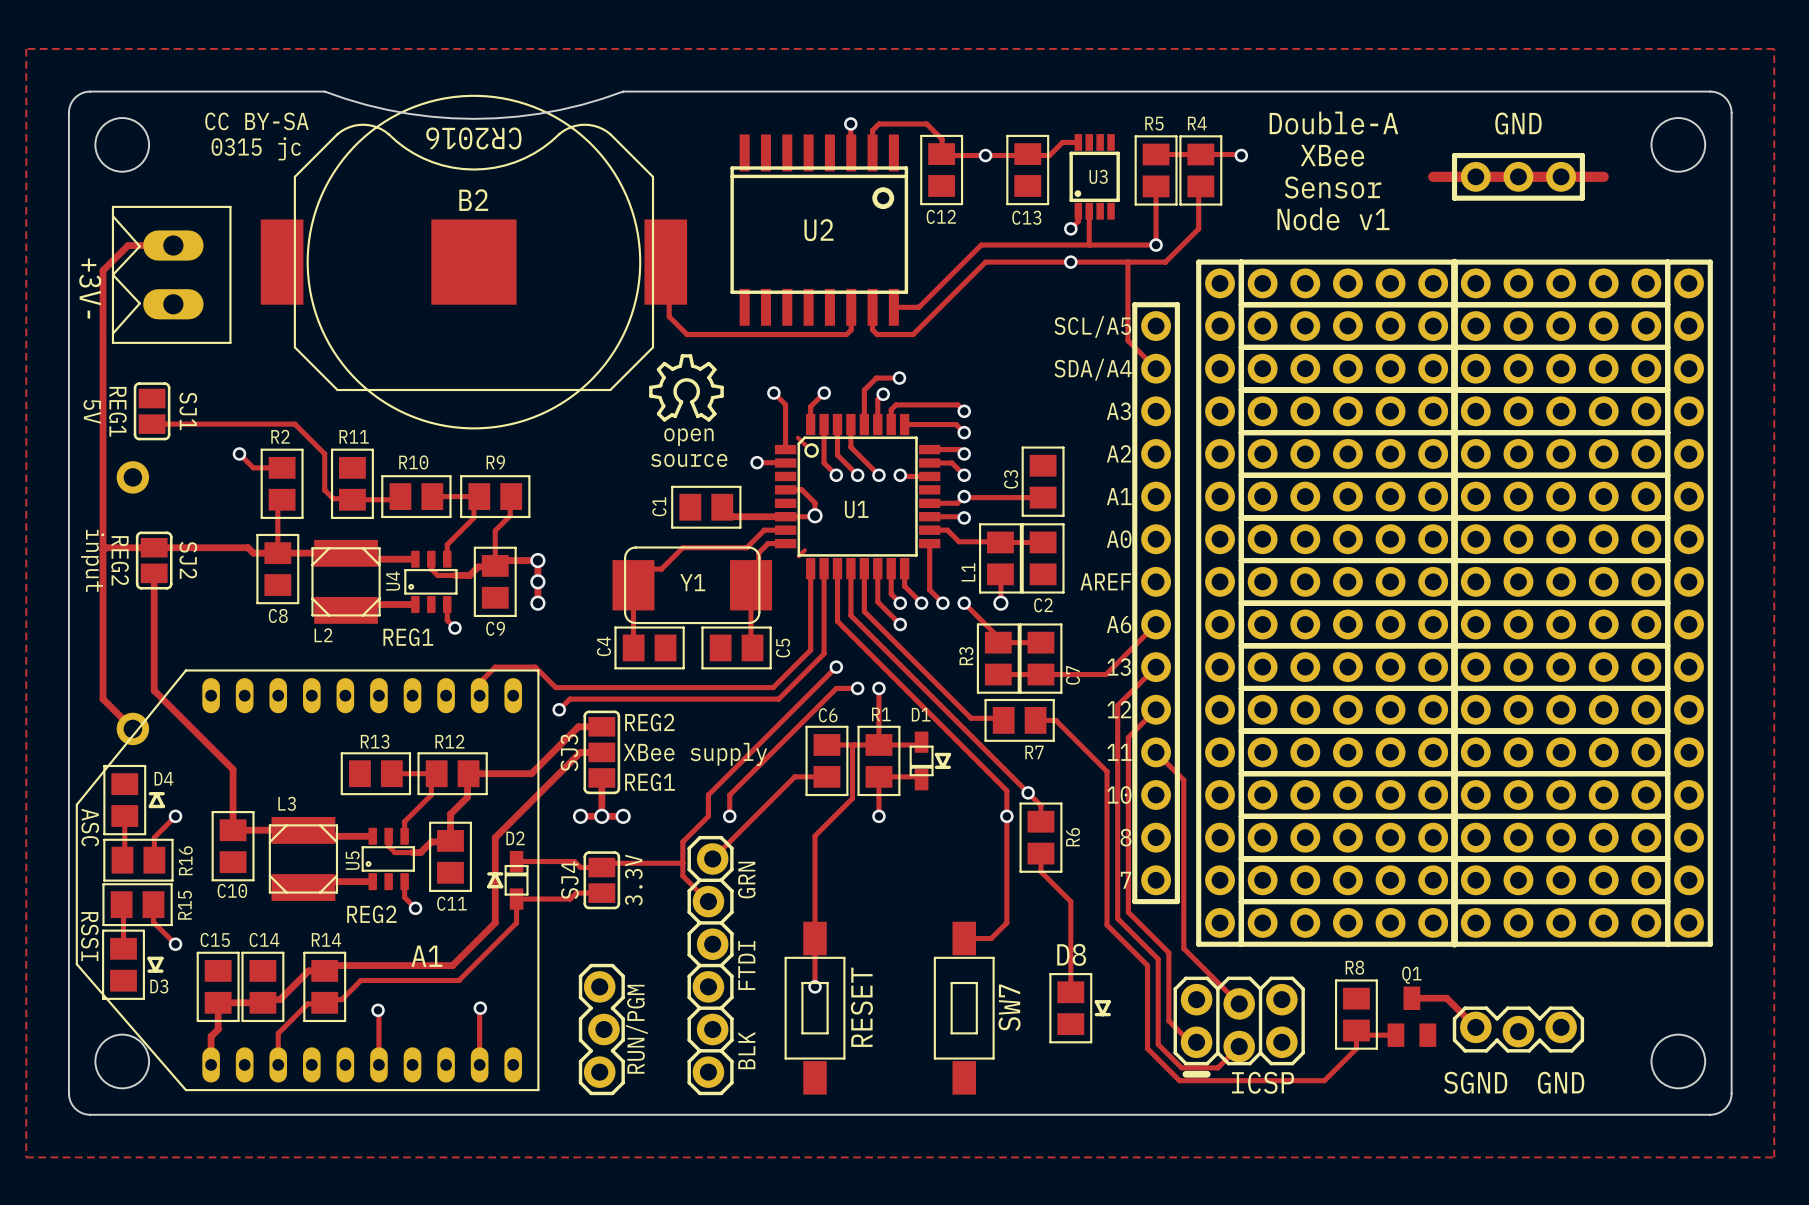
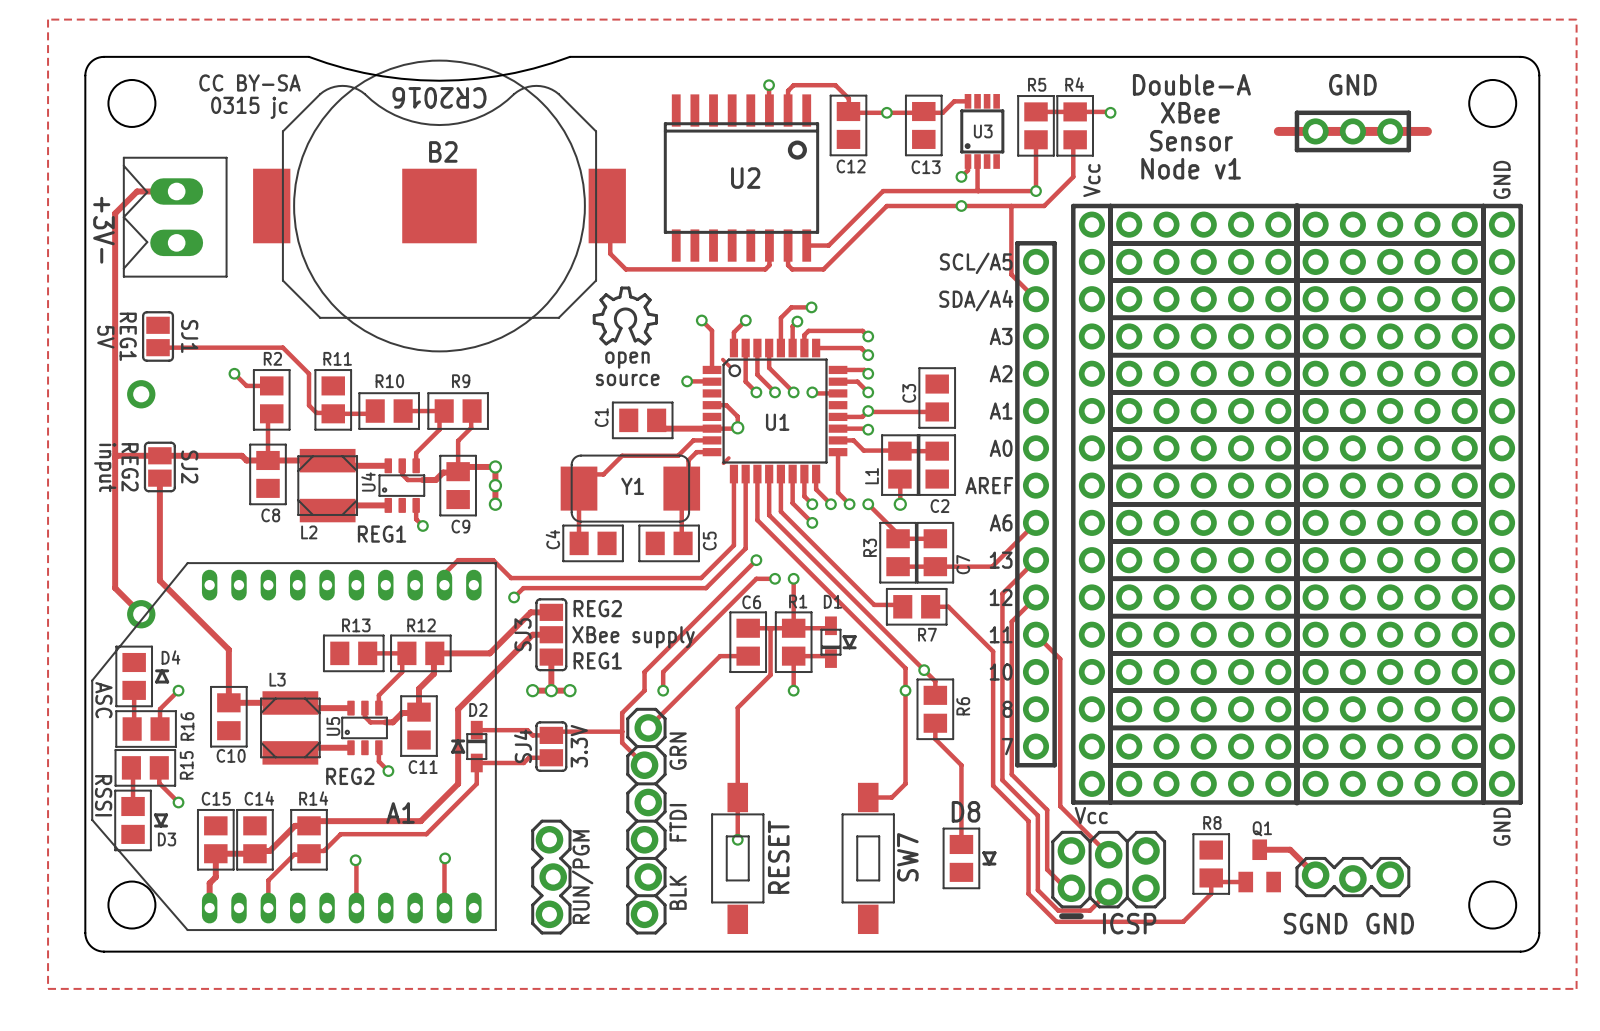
text: none -> Vcc (1091, 180)
text: none -> GND (1502, 179)
text: none -> Vcc (1091, 815)
text: none -> GND (1502, 826)

